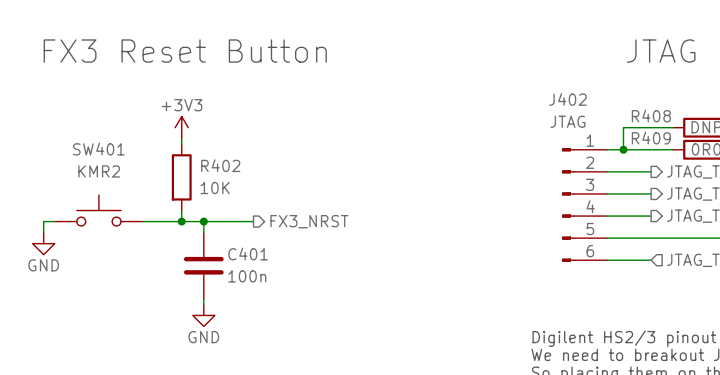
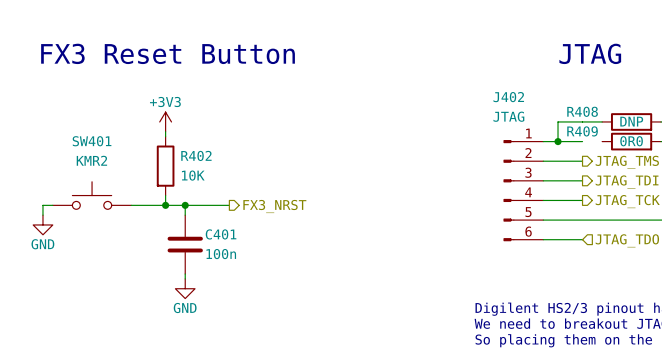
wire: (651, 149) (673, 149) -> none

